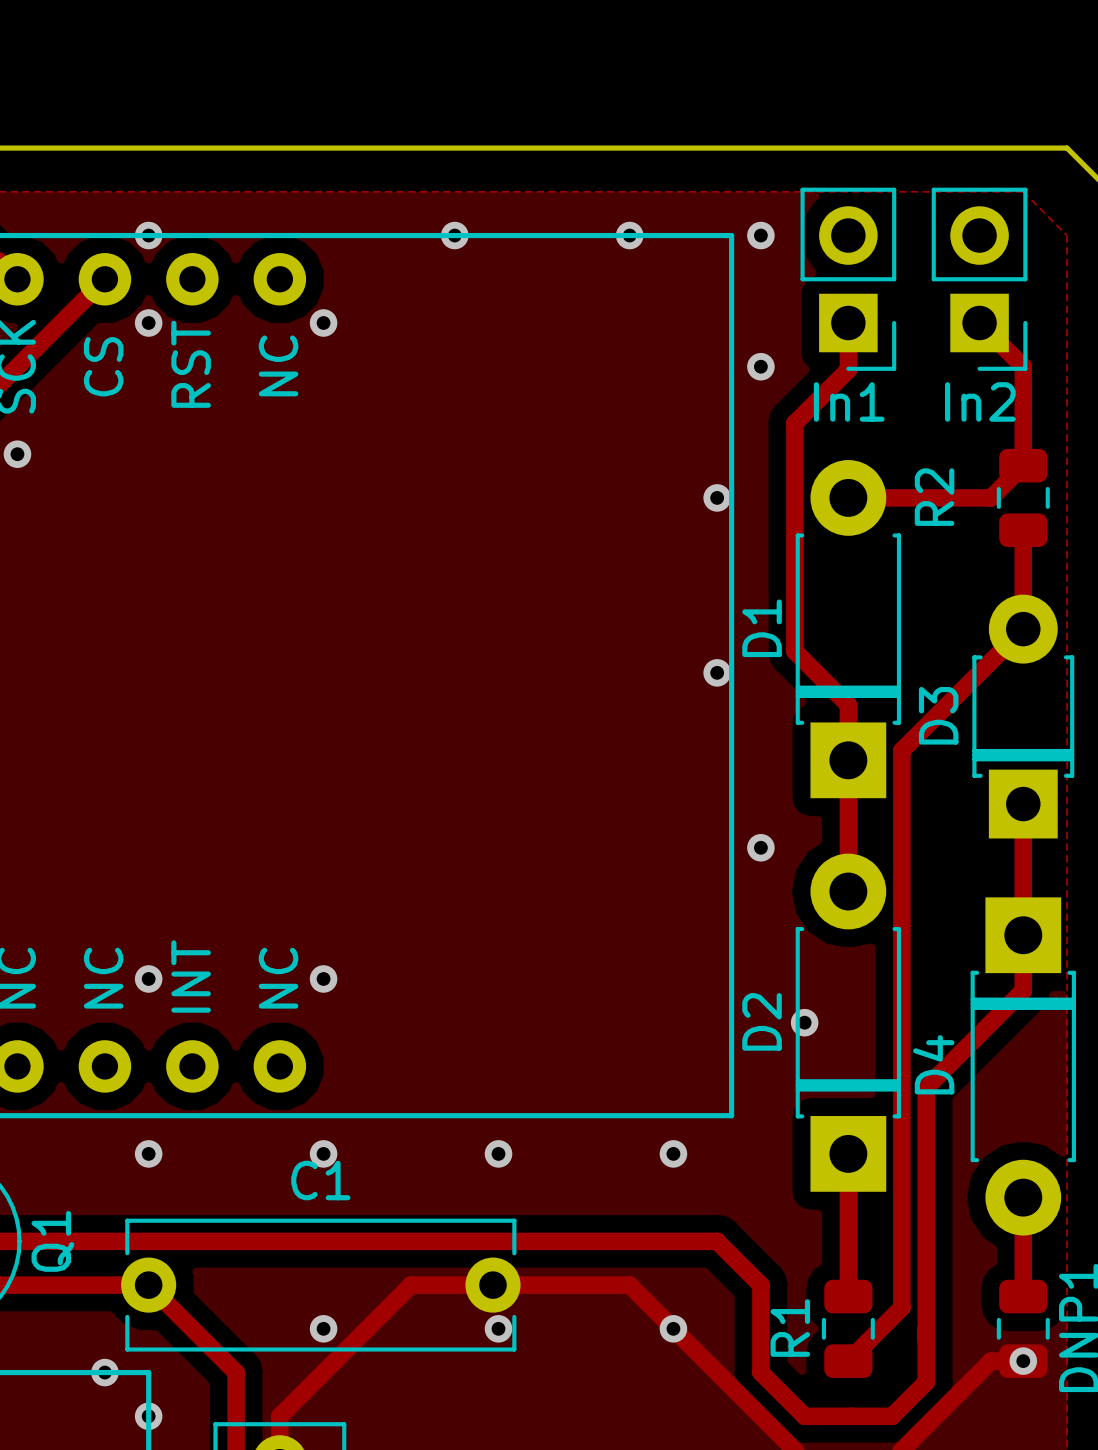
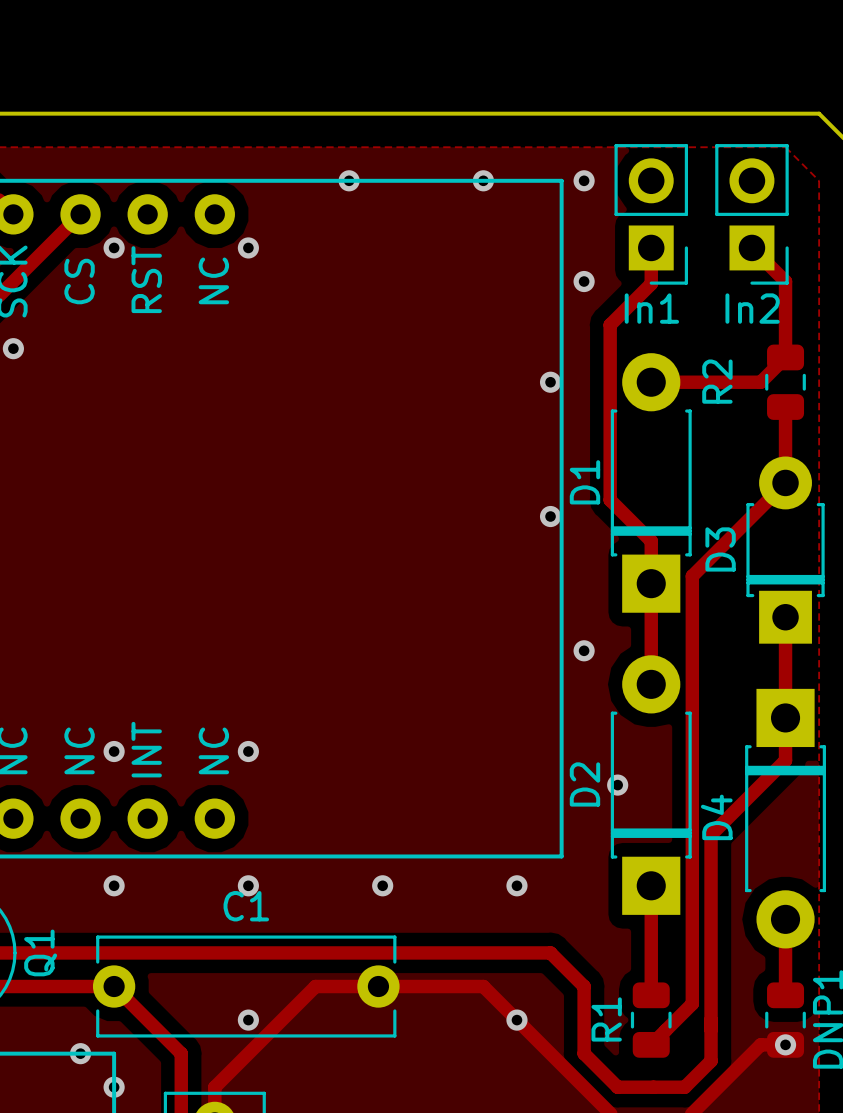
via: (148, 235) -> none
via: (498, 1328) -> none

